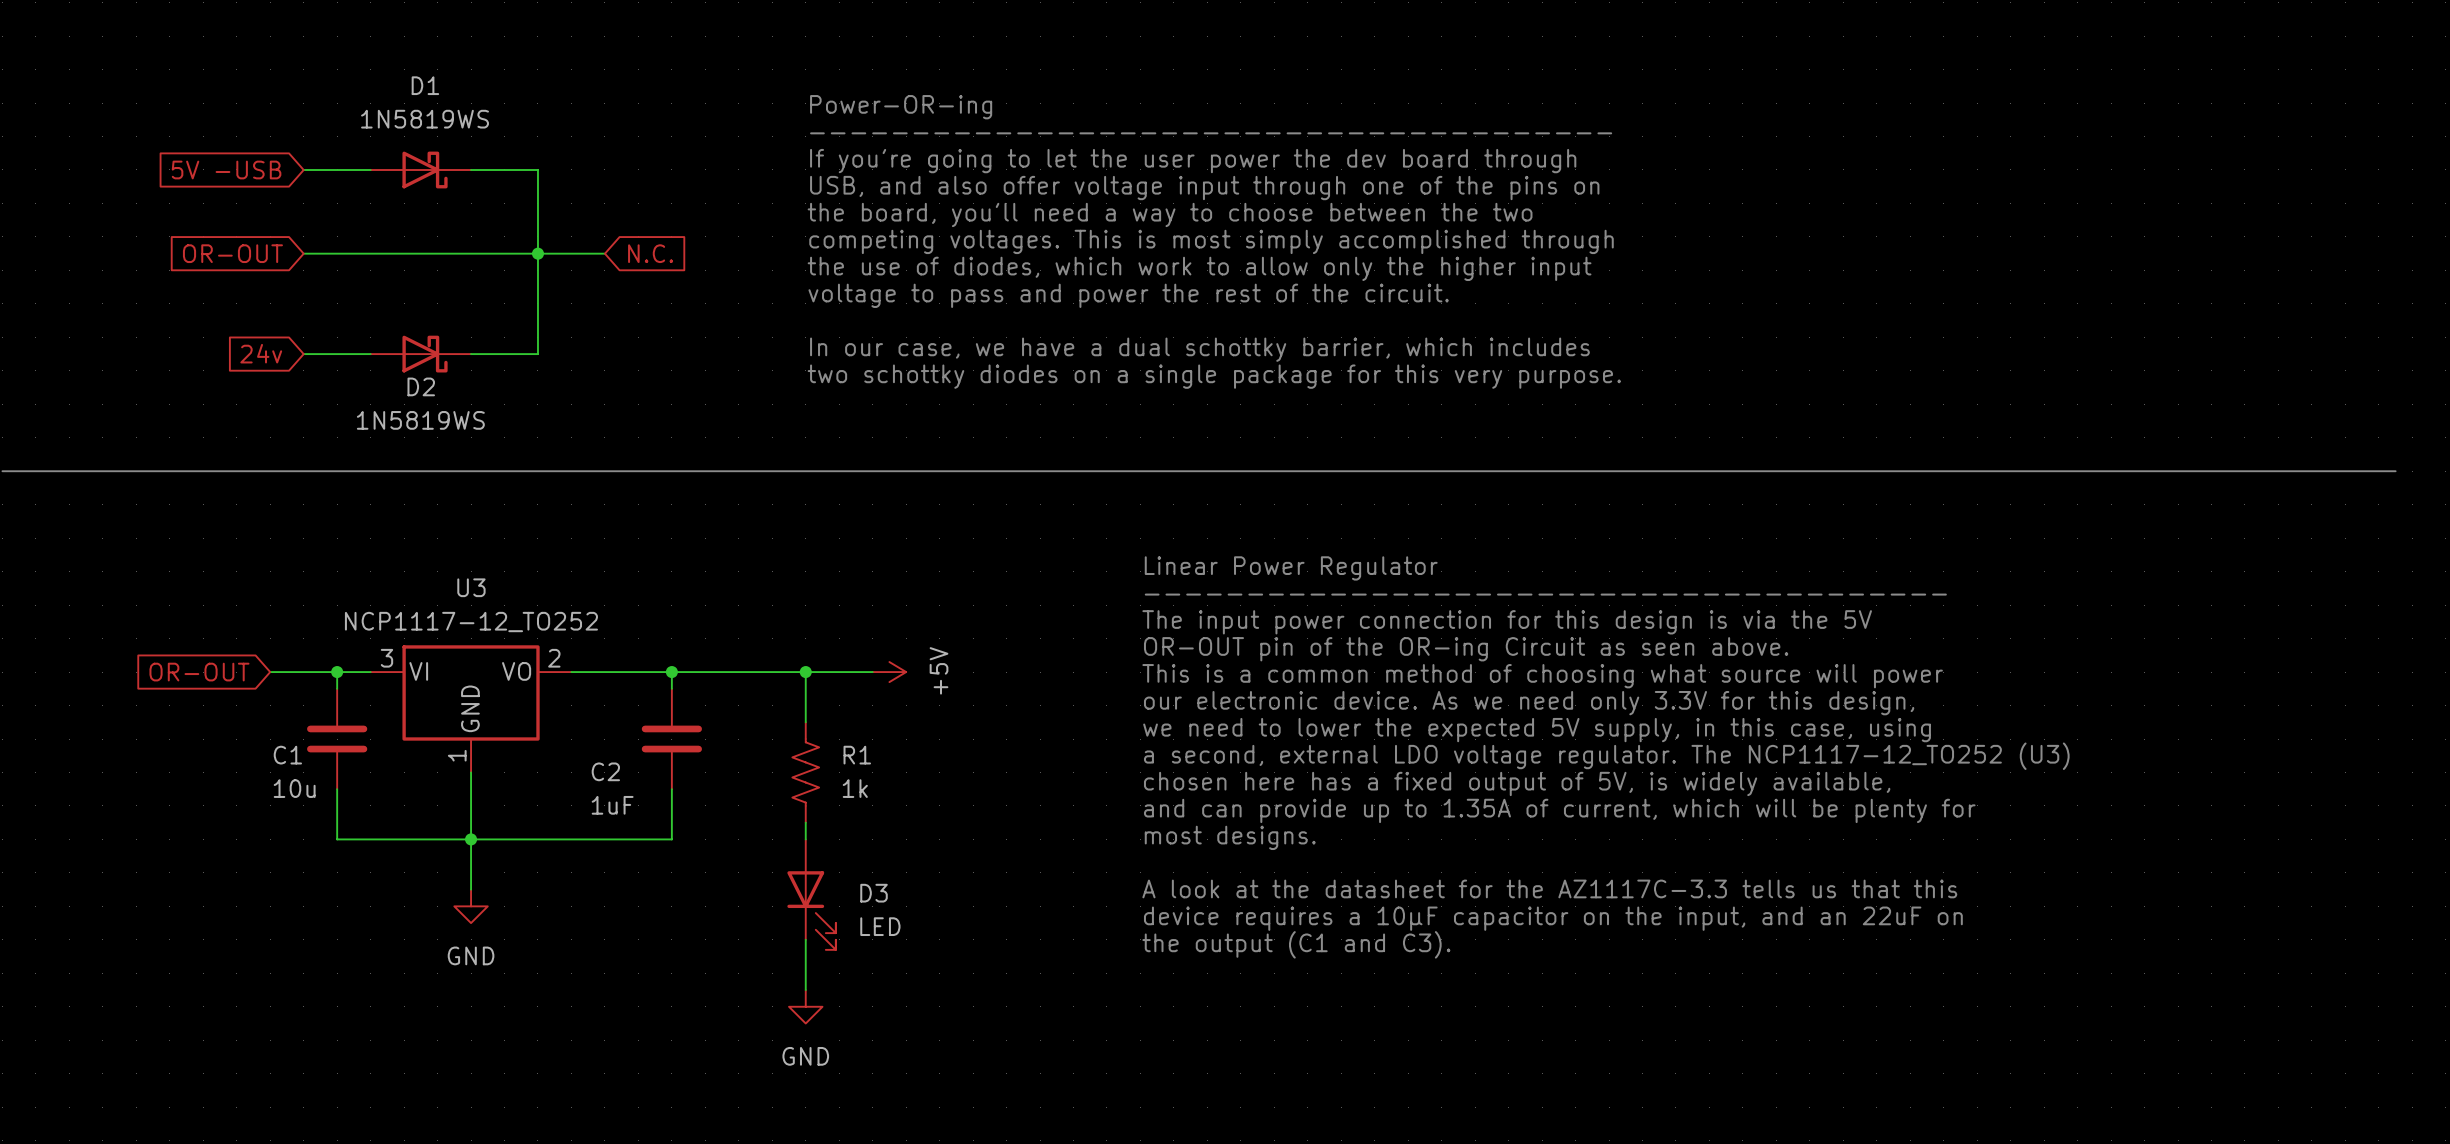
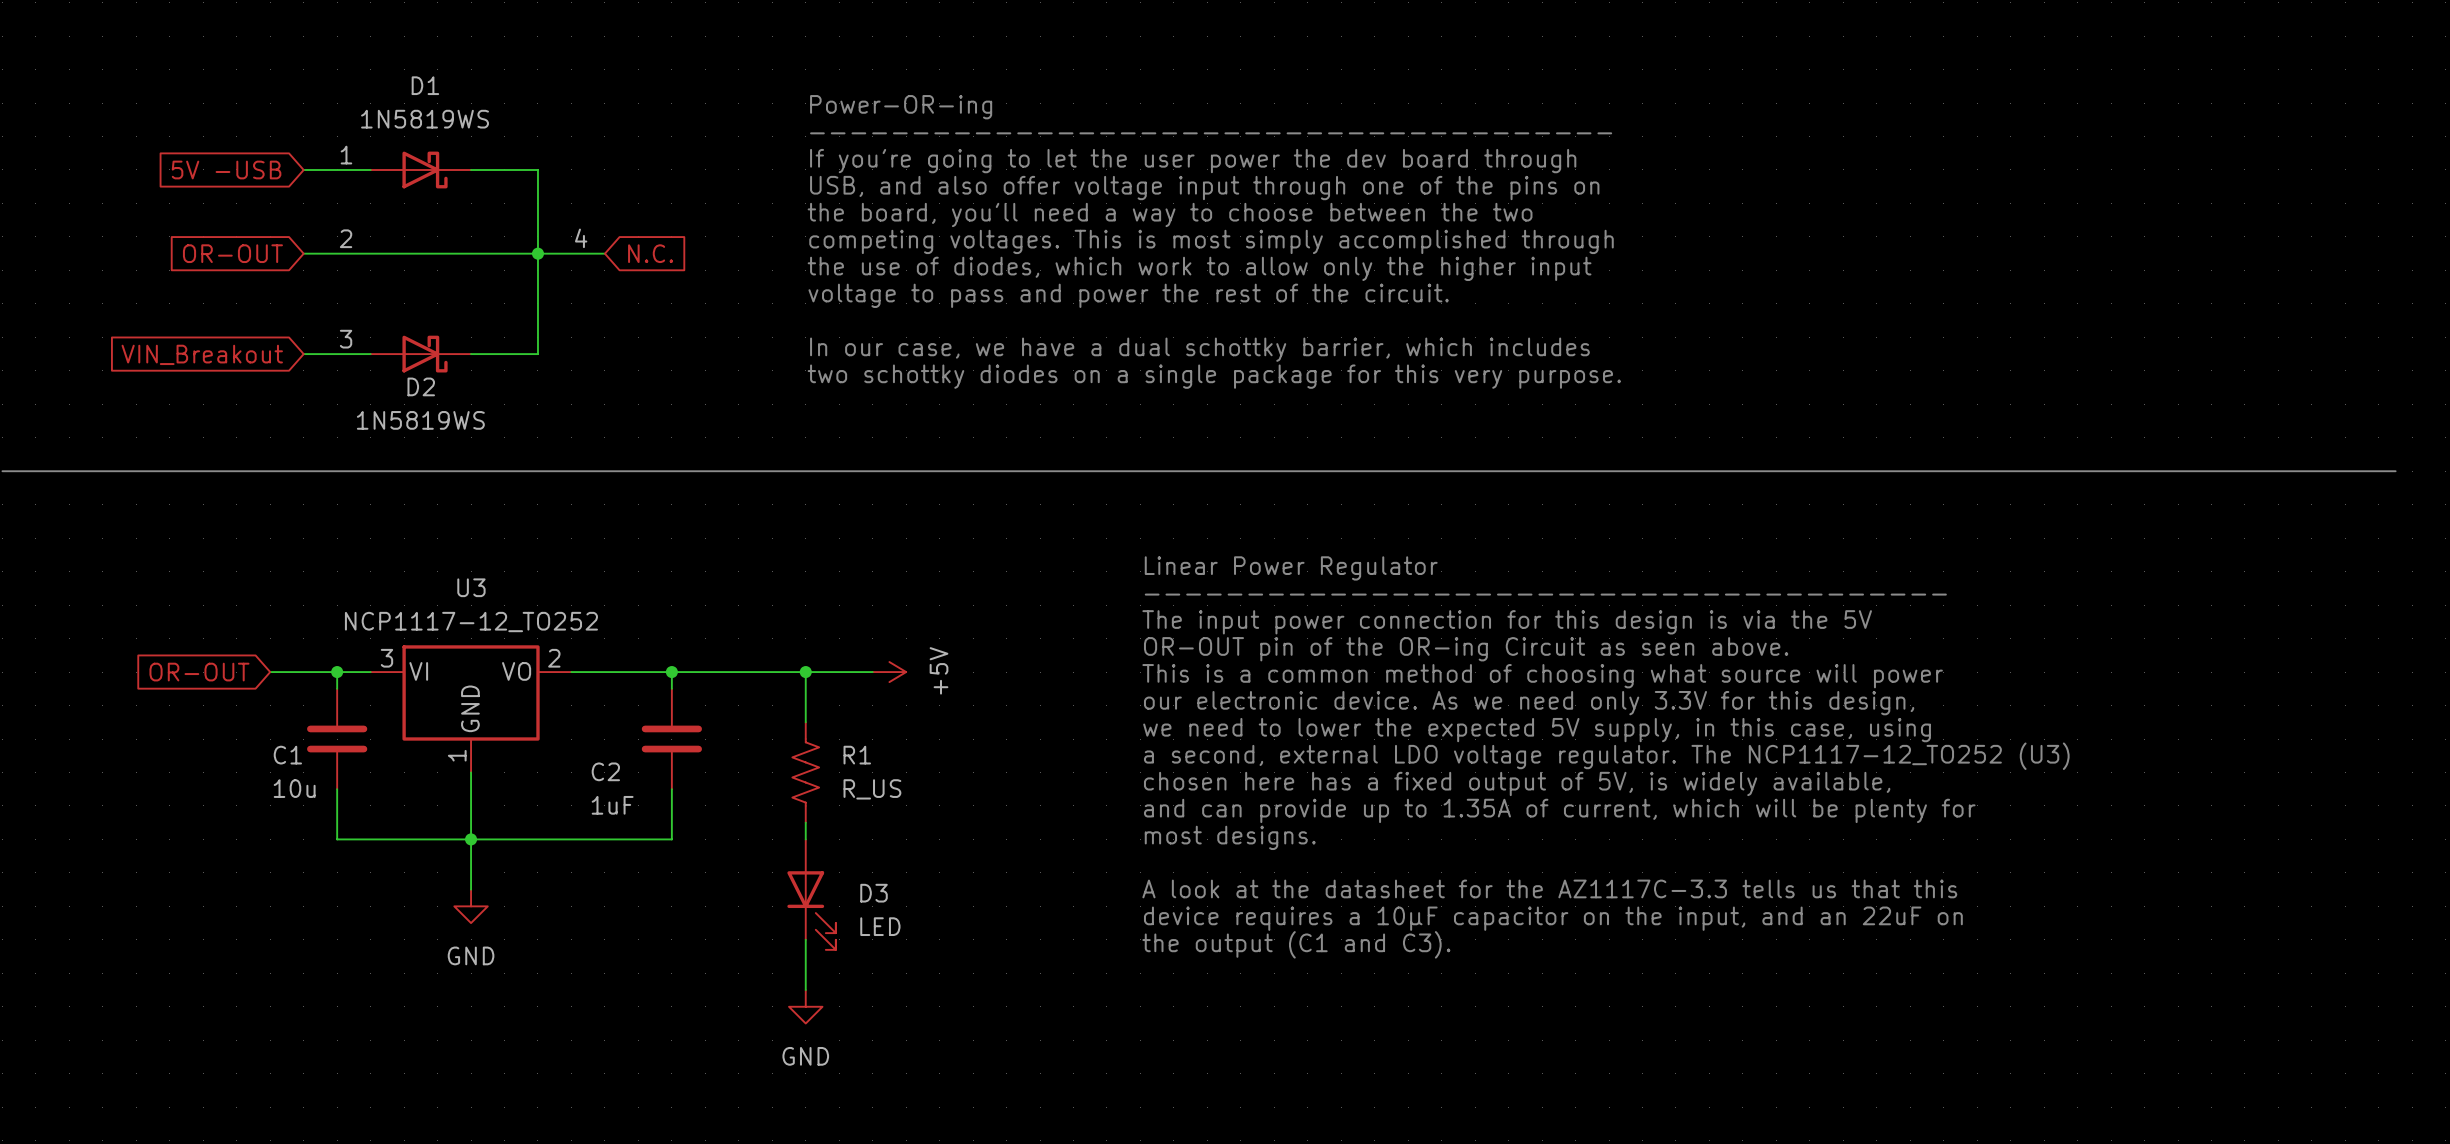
label: none -> 1 (346, 155)
label: none -> 2 (346, 238)
label: none -> 4 (581, 238)
label: none -> 3 (346, 339)
global label: 24v (261, 353) -> VIN_Breakout (202, 354)
R1 value: 1k (855, 788) -> R_US (872, 789)

